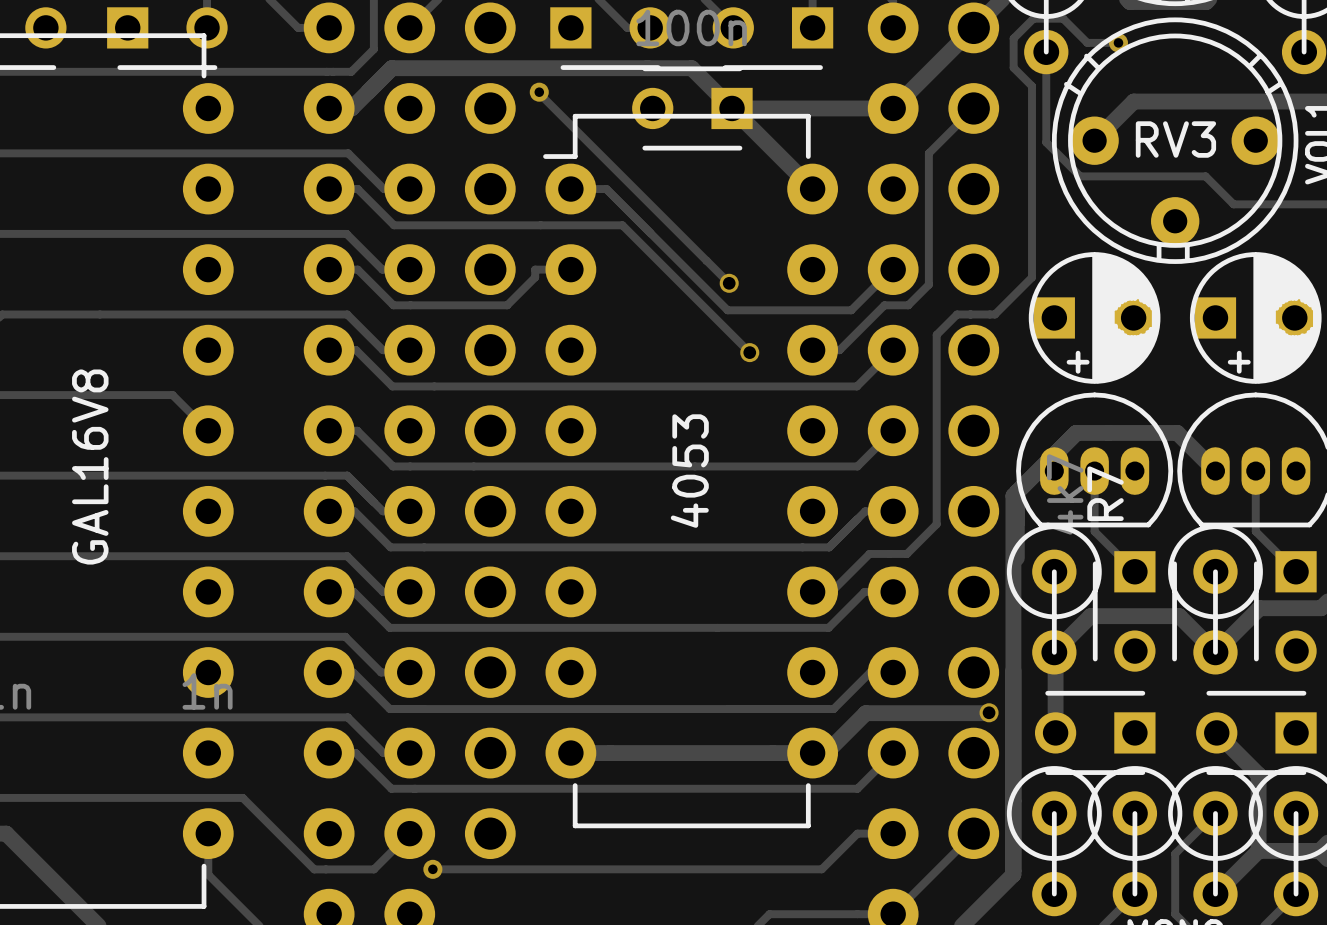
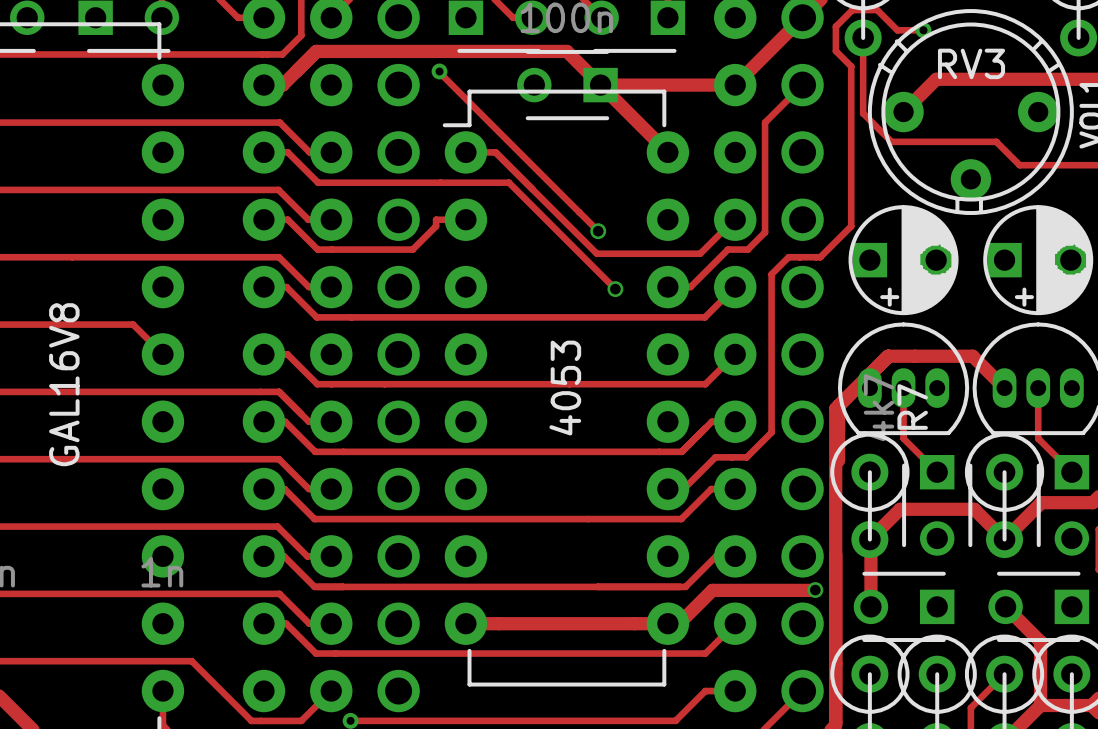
RV3 name position: RV3 (1175, 139) -> RV3 (971, 63)

